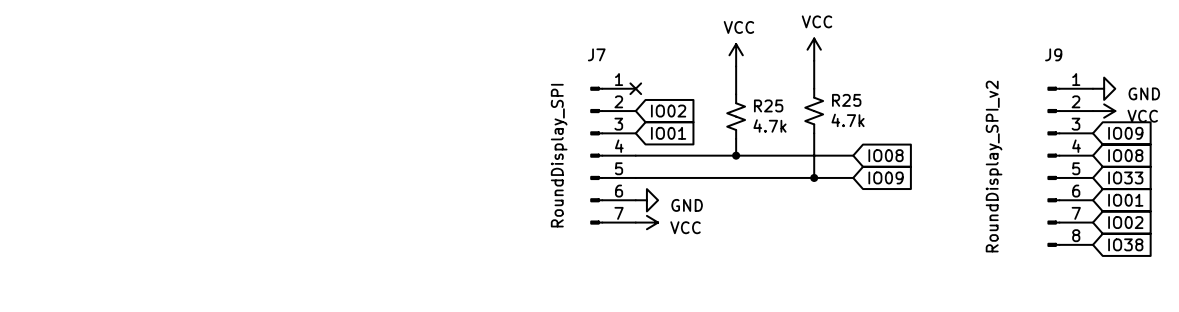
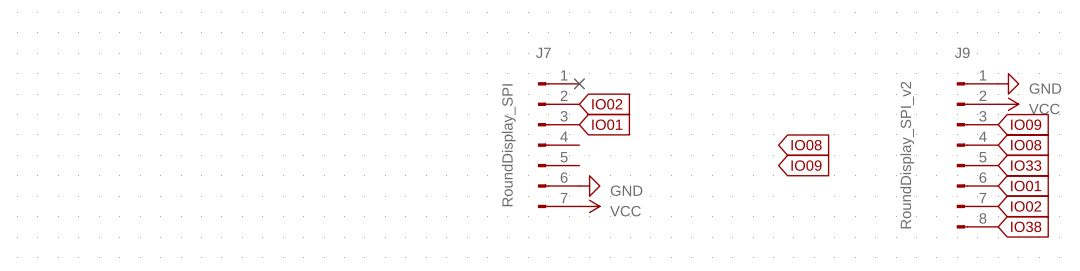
power symbol: VCC (814, 49) -> none
power symbol: VCC (736, 55) -> none
wire: (814, 60) (814, 88) -> none
wire: (736, 66) (736, 94) -> none
R25: 4.7k (814, 111) -> none
R25: 4.7k (736, 116) -> none
wire: (814, 133) (814, 177) -> none
wire: (736, 138) (736, 155) -> none
wire: (635, 155) (853, 155) -> none
junction: (736, 155) -> none
wire: (635, 177) (853, 177) -> none
junction: (814, 177) -> none

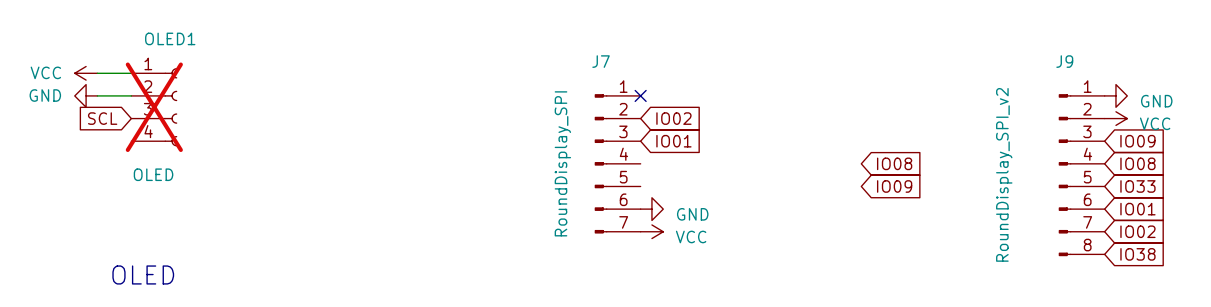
power symbol: none -> VCC (86, 73)
wire: none -> (97, 73) (131, 73)
power symbol: none -> GND (86, 95)
wire: none -> (97, 95) (131, 95)
OLED1: none -> OLED (154, 107)
global label: none -> SCL (102, 118)
text: none -> OLED (143, 274)

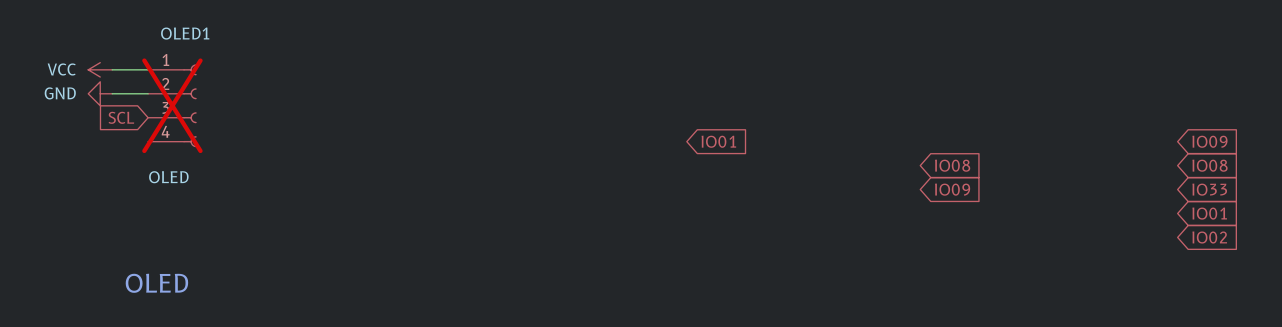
no-connect mark: (640, 95) -> none
power symbol: GND (1115, 95) -> none
global label: IO02 (673, 118) -> none
power symbol: VCC (1115, 118) -> none
J7: RoundDisplay_SPI (617, 163) -> none
J9: RoundDisplay_SPI_v2 (1081, 175) -> none
power symbol: GND (651, 209) -> none
power symbol: VCC (651, 231) -> none
global label: IO38 (1137, 254) -> none

